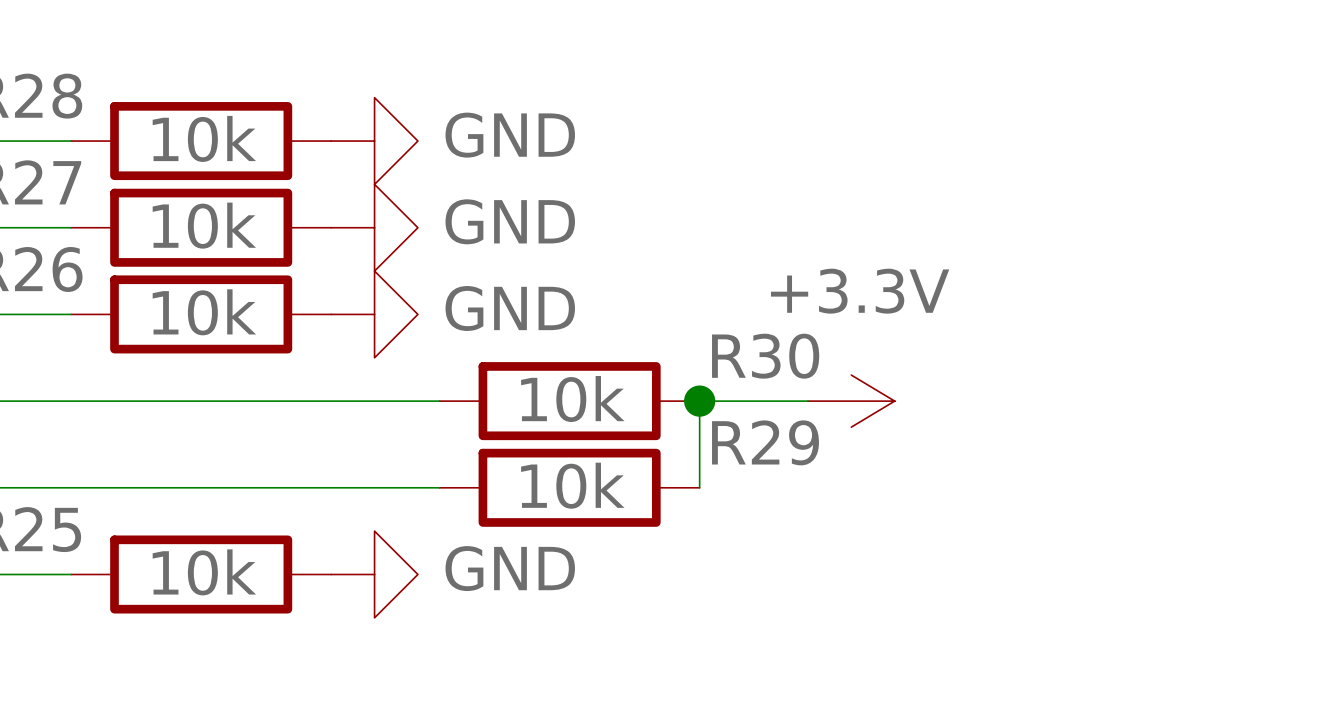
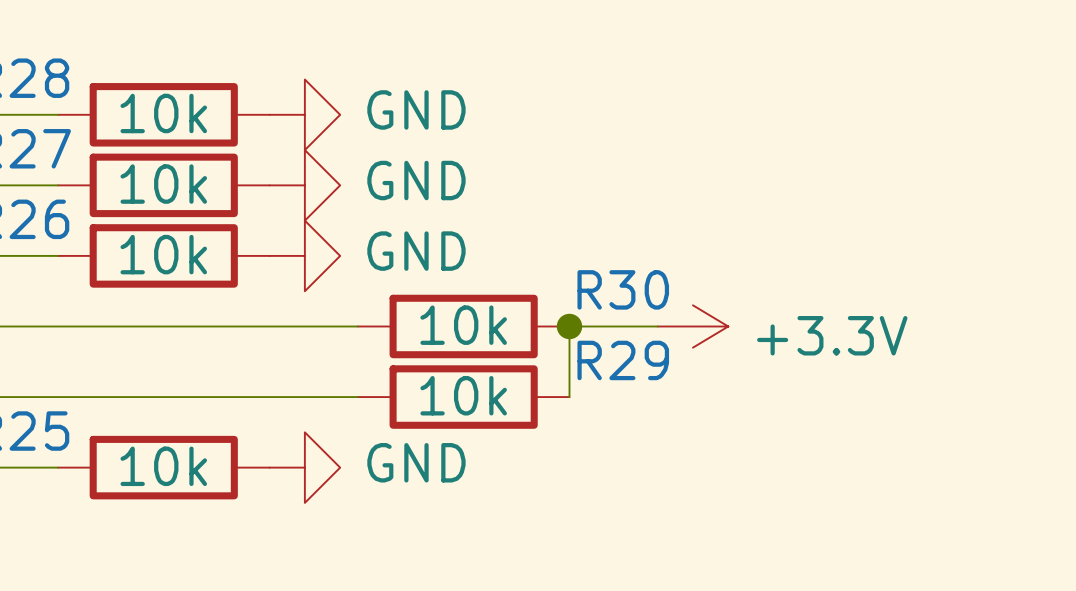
power symbol text position: +3.3V (860, 291) -> +3.3V (832, 335)

